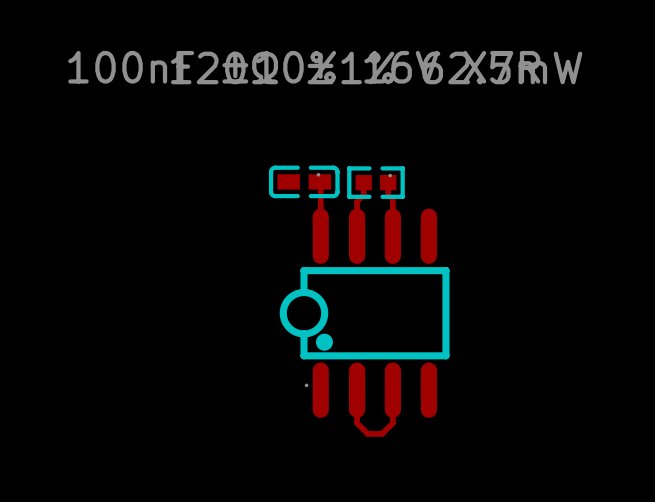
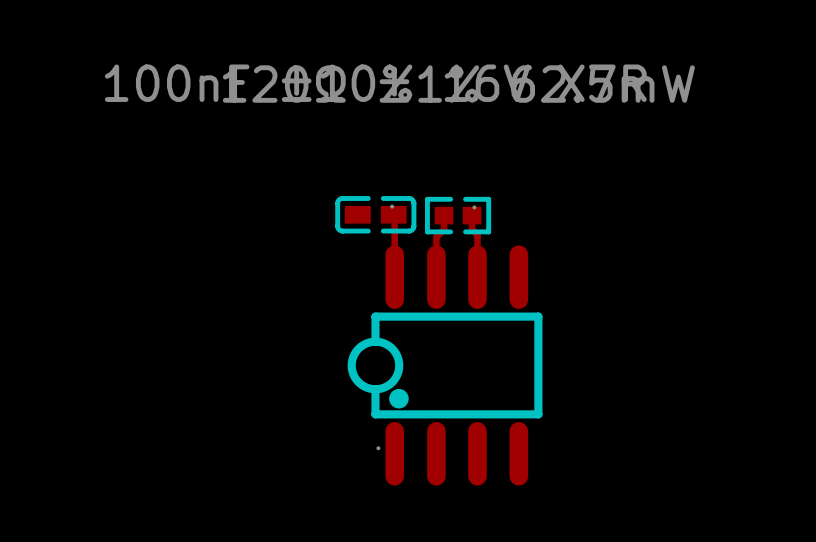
track: (357, 390) (357, 423) (367, 433) (382, 433) (392, 423) (392, 390) -> none

